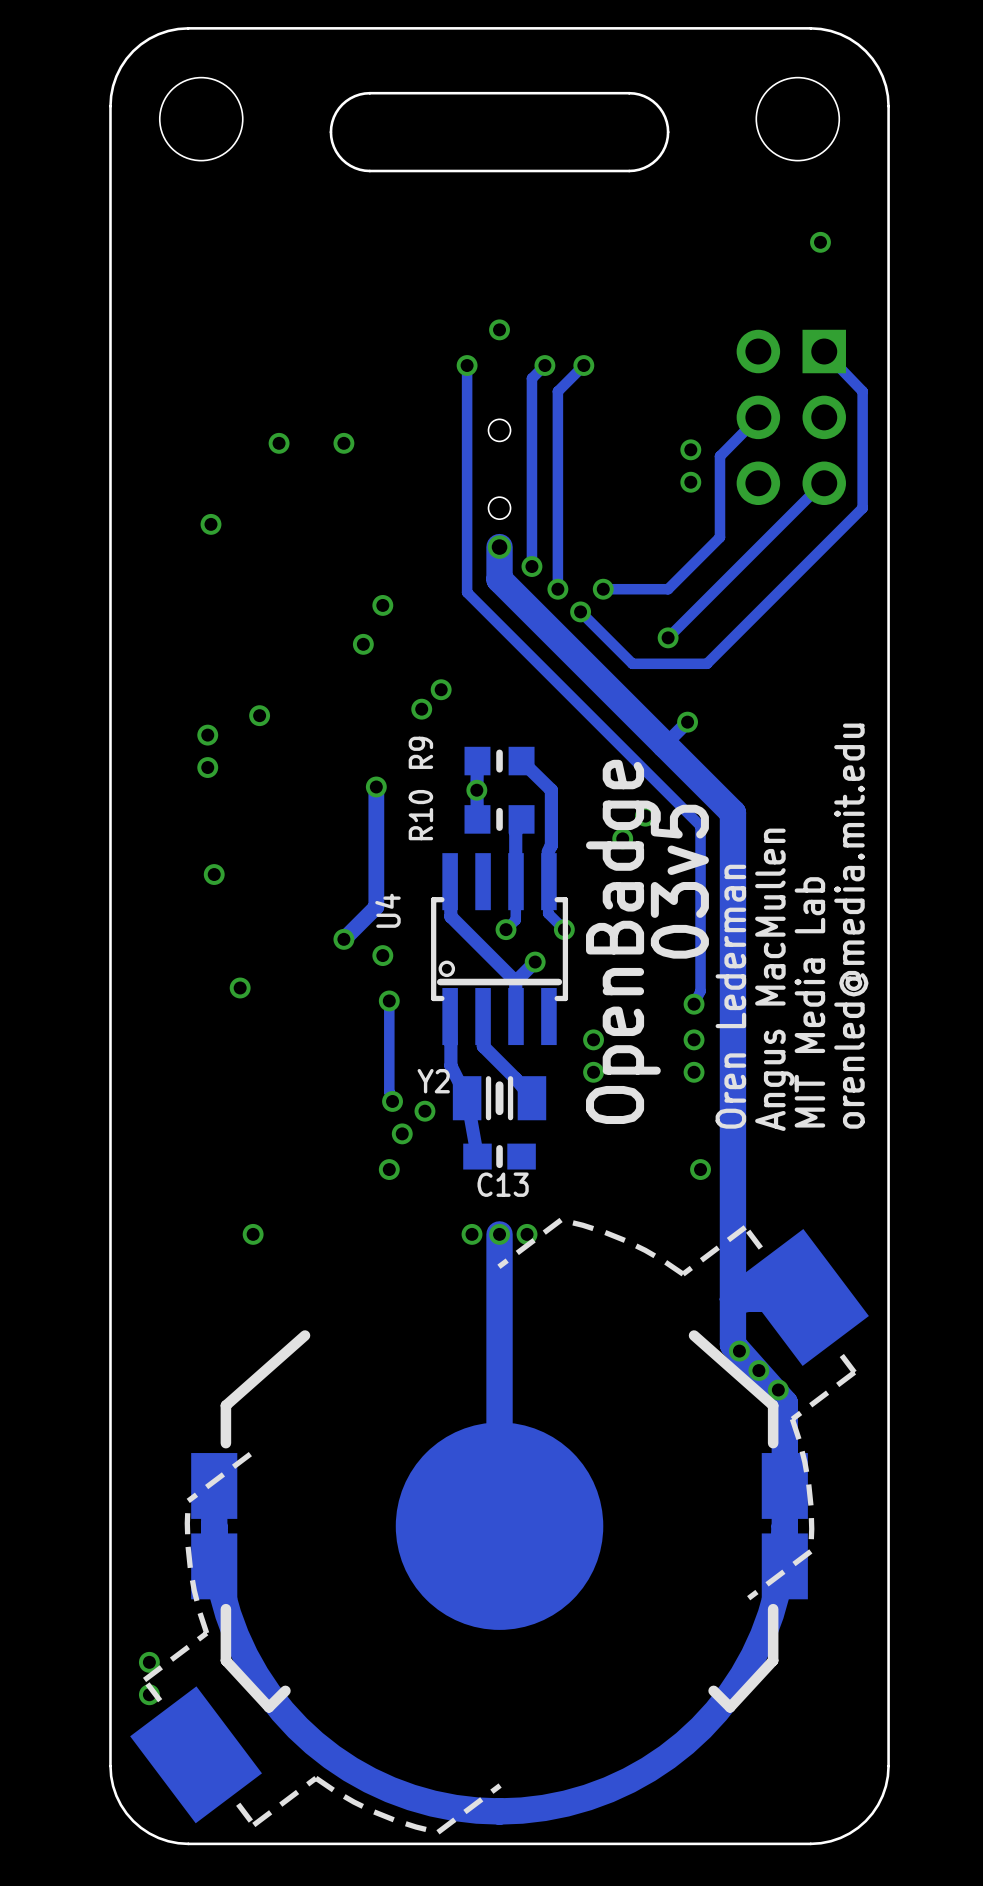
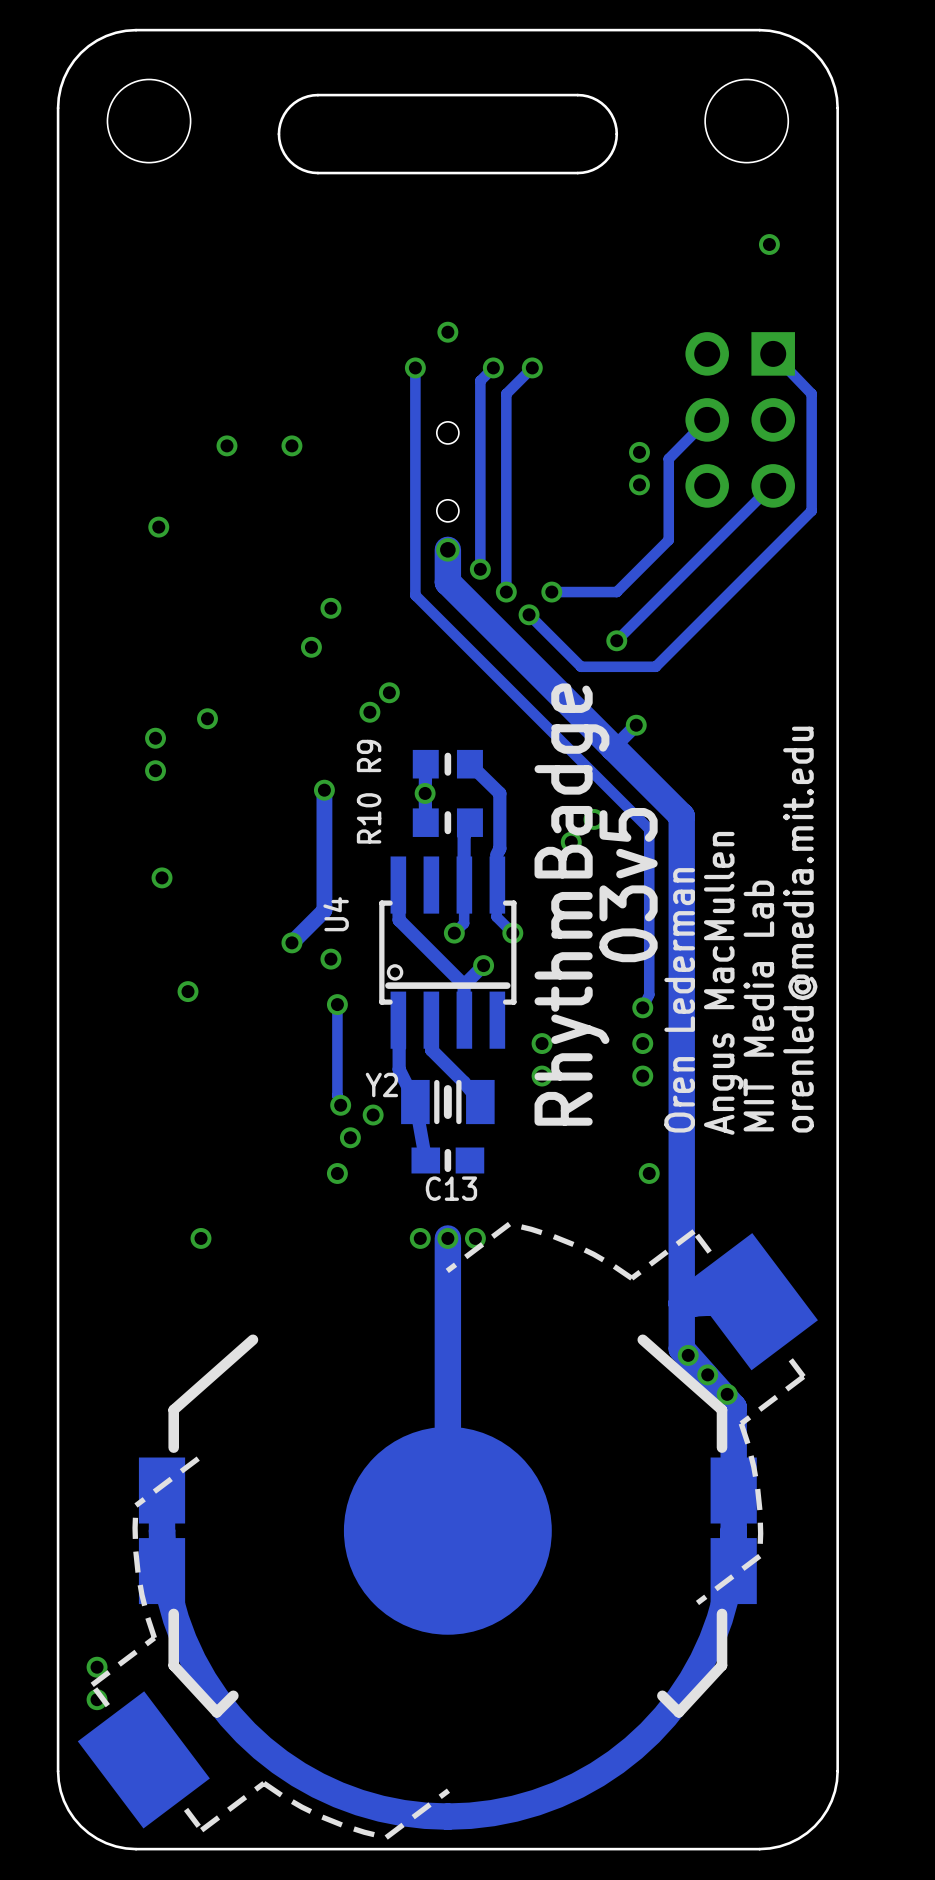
text: OpenBadge (623, 941) -> RhythmBadge (571, 904)

